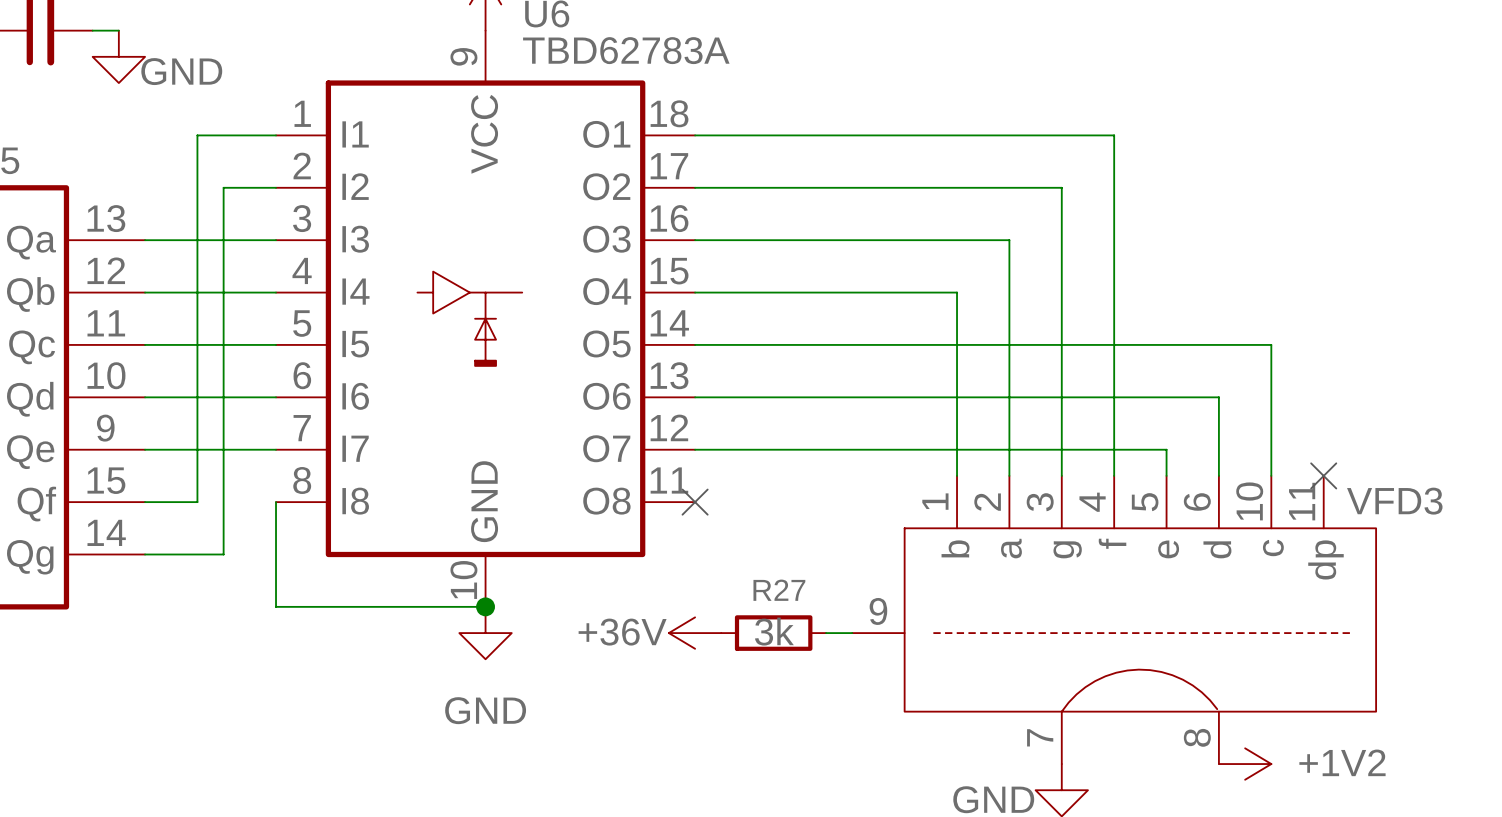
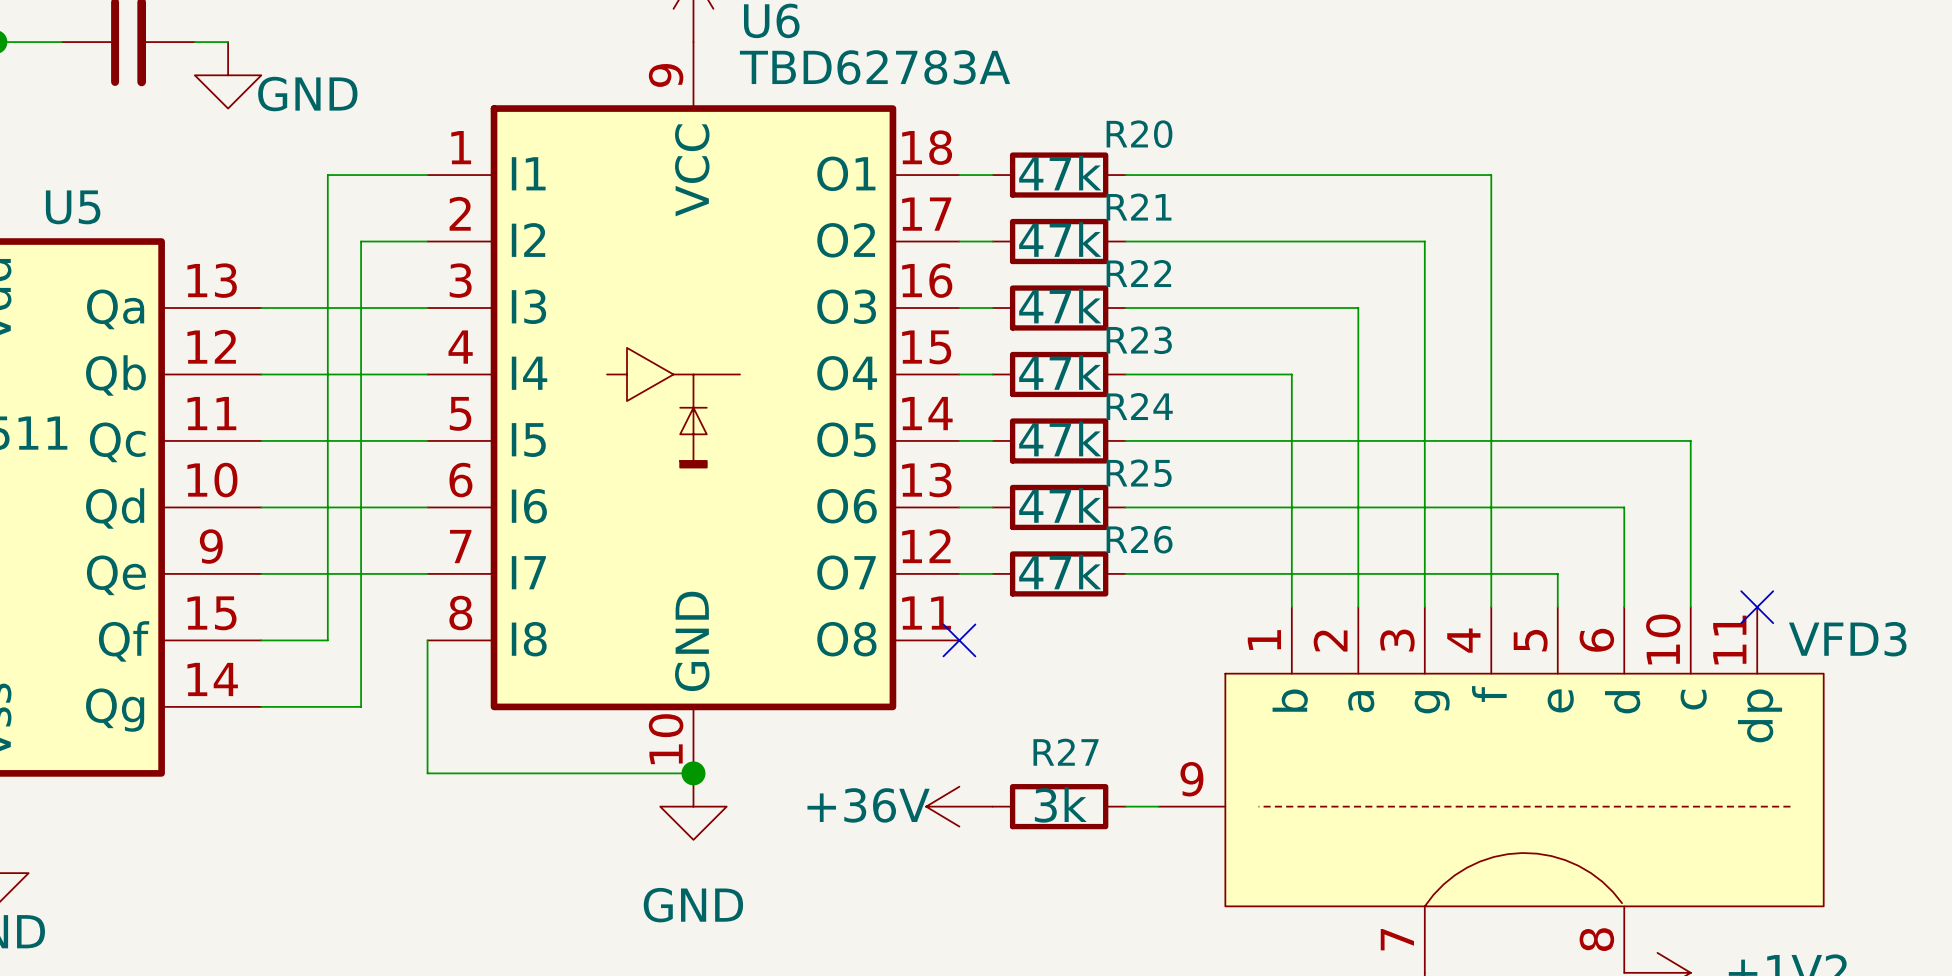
wire: (721, 135) (826, 135) -> none
R20: none -> 47k (1059, 175)
wire: (721, 187) (826, 187) -> none
R21: none -> 47k (1059, 241)
wire: (721, 240) (826, 240) -> none
R22: none -> 47k (1059, 308)
wire: (721, 292) (826, 292) -> none
R23: none -> 47k (1059, 374)
wire: (721, 344) (826, 344) -> none
R24: none -> 47k (1059, 440)
wire: (721, 397) (826, 397) -> none
R25: none -> 47k (1059, 507)
wire: (721, 449) (826, 449) -> none
R26: none -> 47k (1059, 573)

